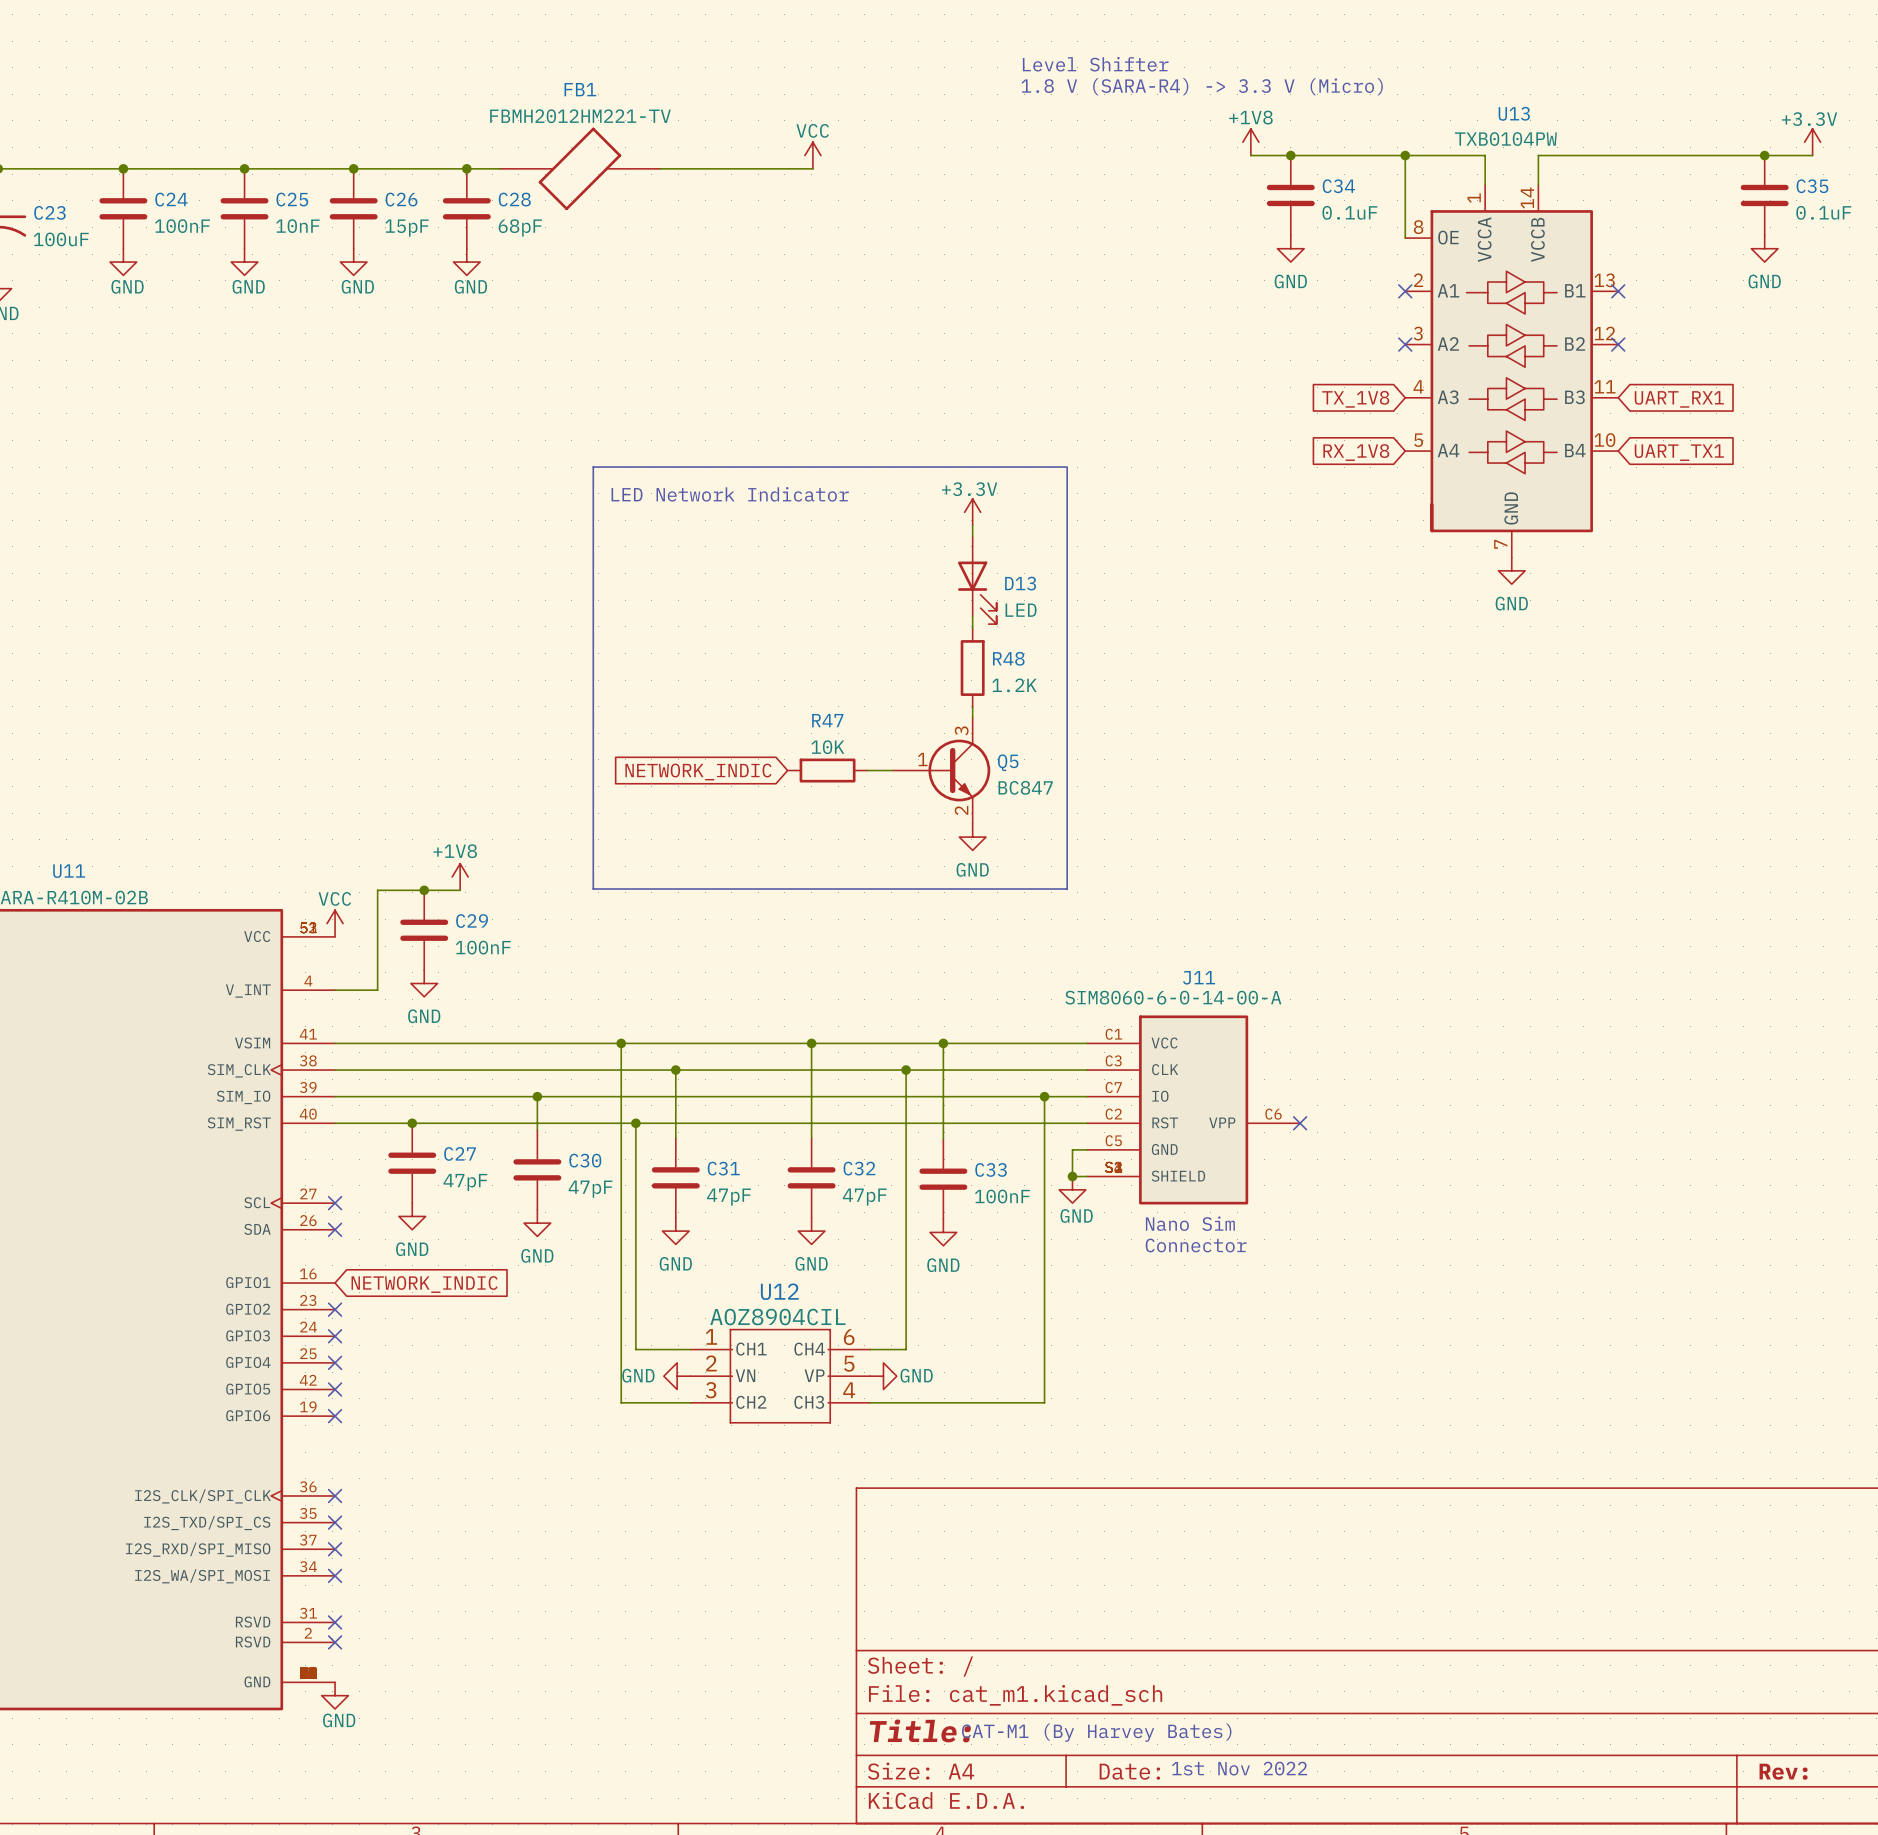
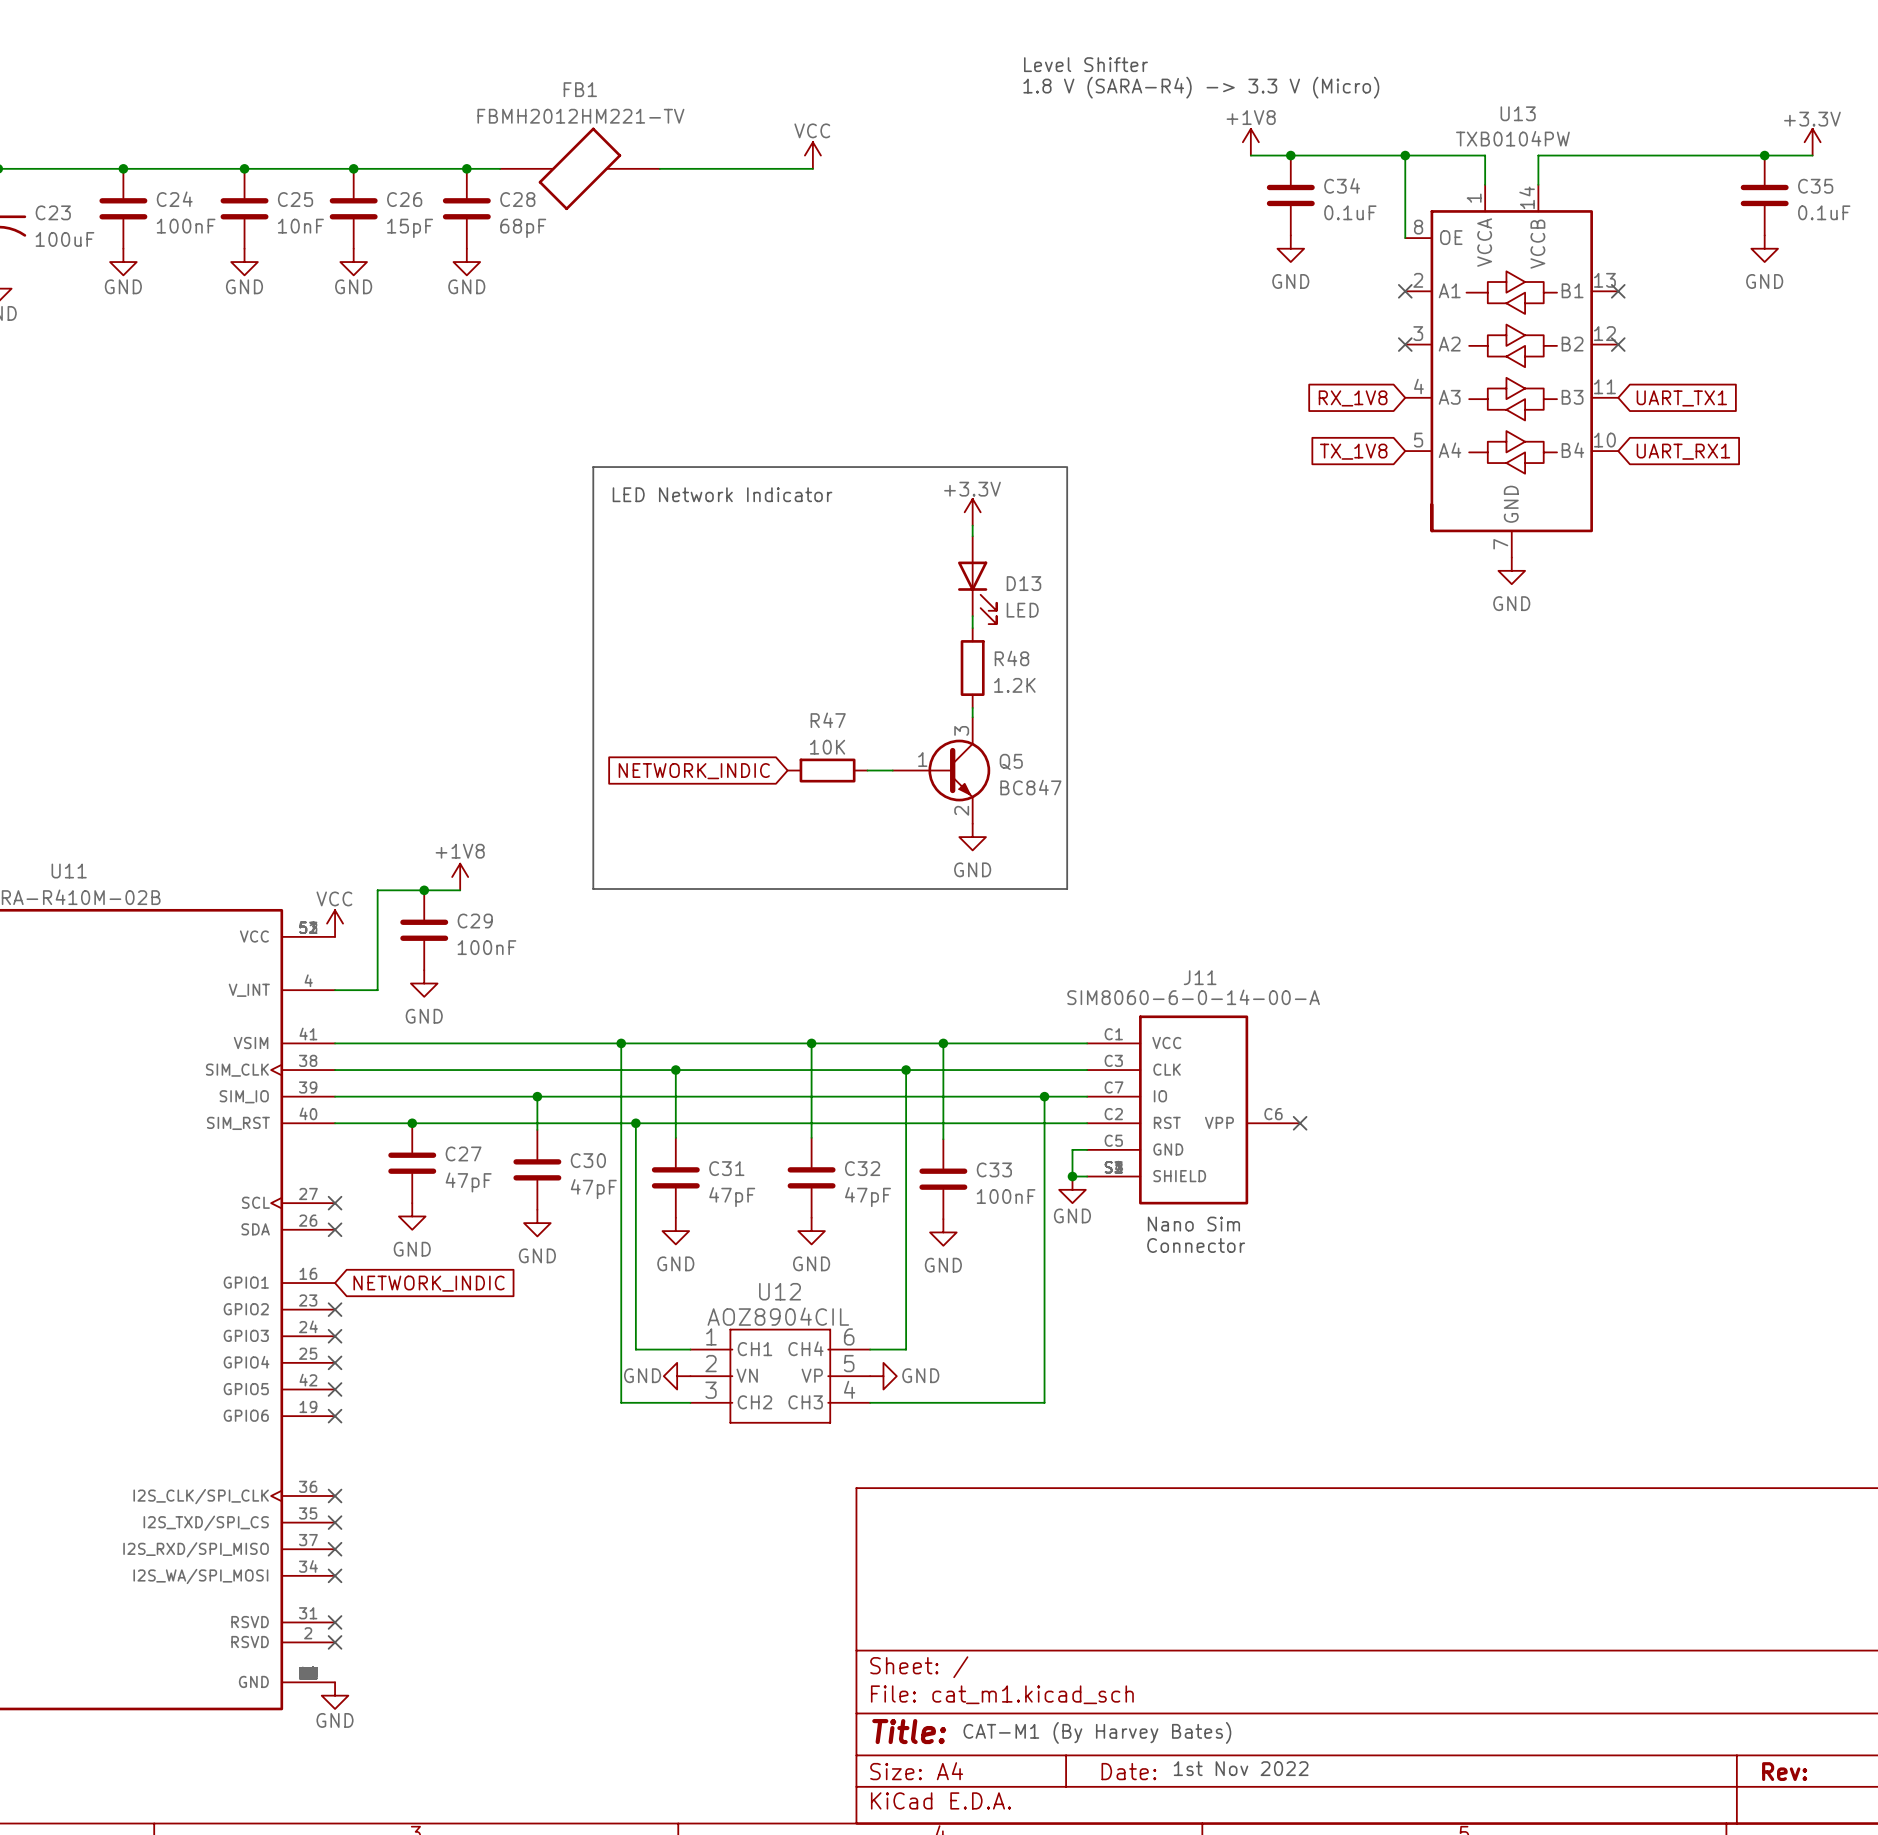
global label: TX_1V8 (1355, 399) -> RX_1V8 (1353, 398)
global label: UART_RX1 (1679, 399) -> UART_TX1 (1681, 398)
global label: RX_1V8 (1356, 452) -> TX_1V8 (1353, 451)
global label: UART_TX1 (1679, 452) -> UART_RX1 (1683, 451)

